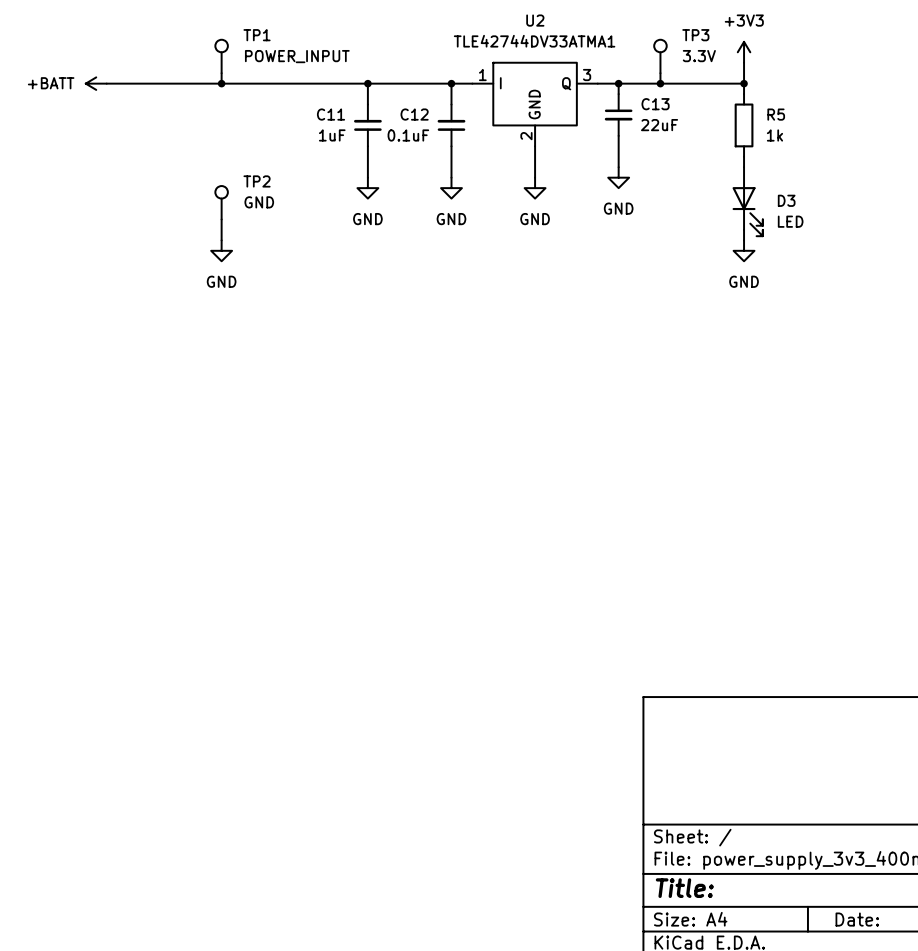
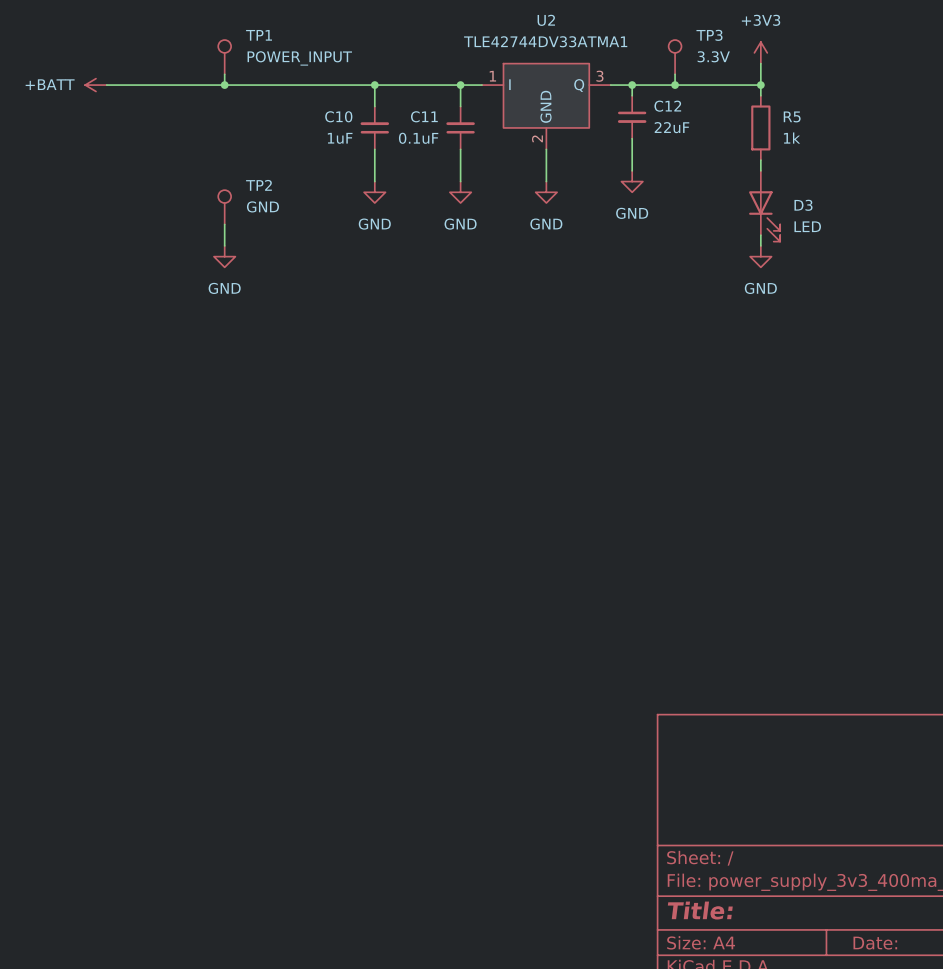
C13 name: C13 (655, 104) -> C12 (667, 106)
C11 name: C11 (331, 114) -> C10 (338, 116)
C12 name: C12 (414, 114) -> C11 (424, 116)

